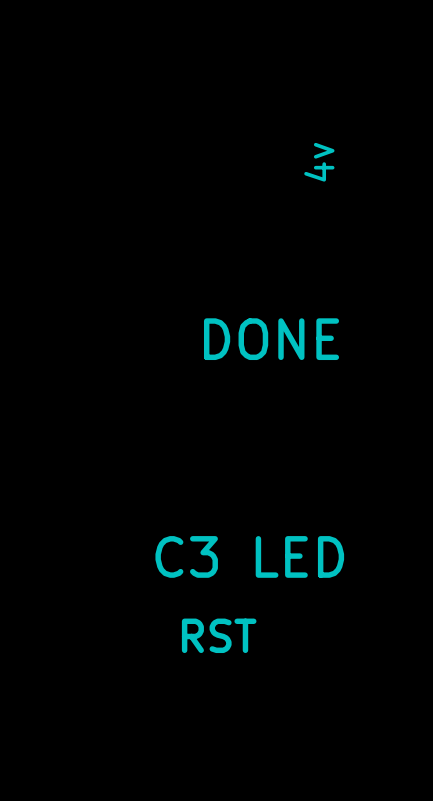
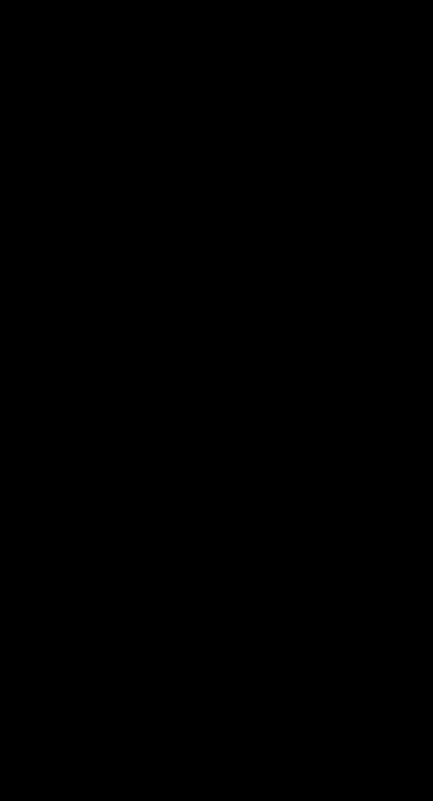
text: 4v (319, 162) -> none
text: DONE (271, 339) -> none
text: C3 LED (249, 556) -> none
text: RST (219, 635) -> none

